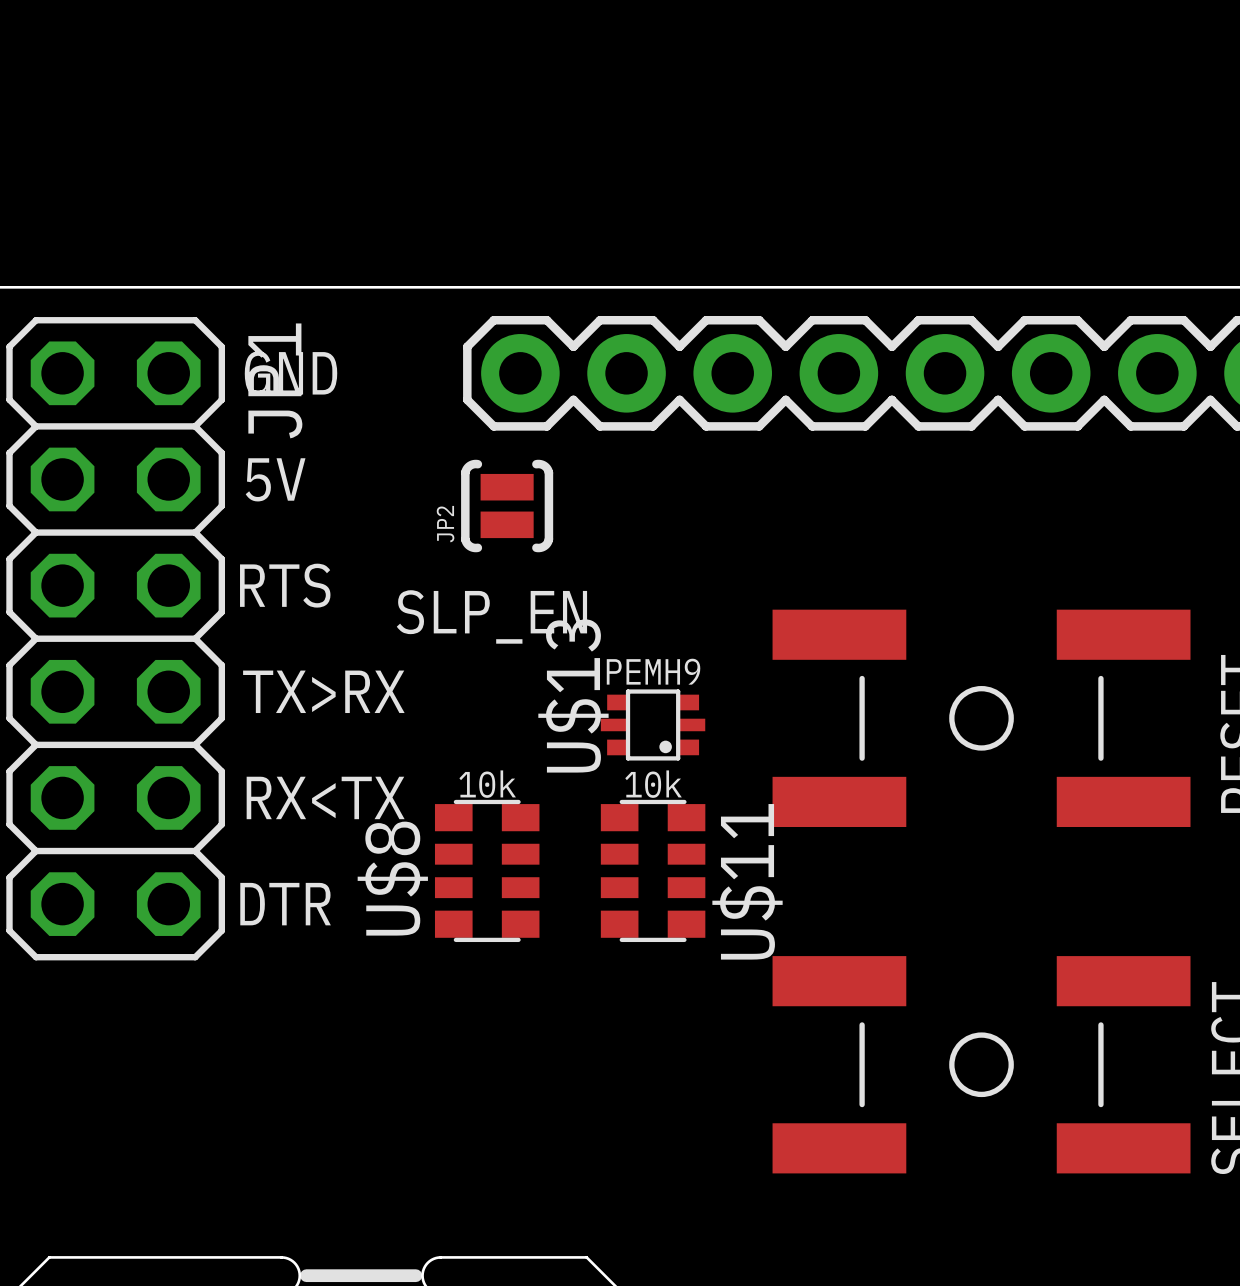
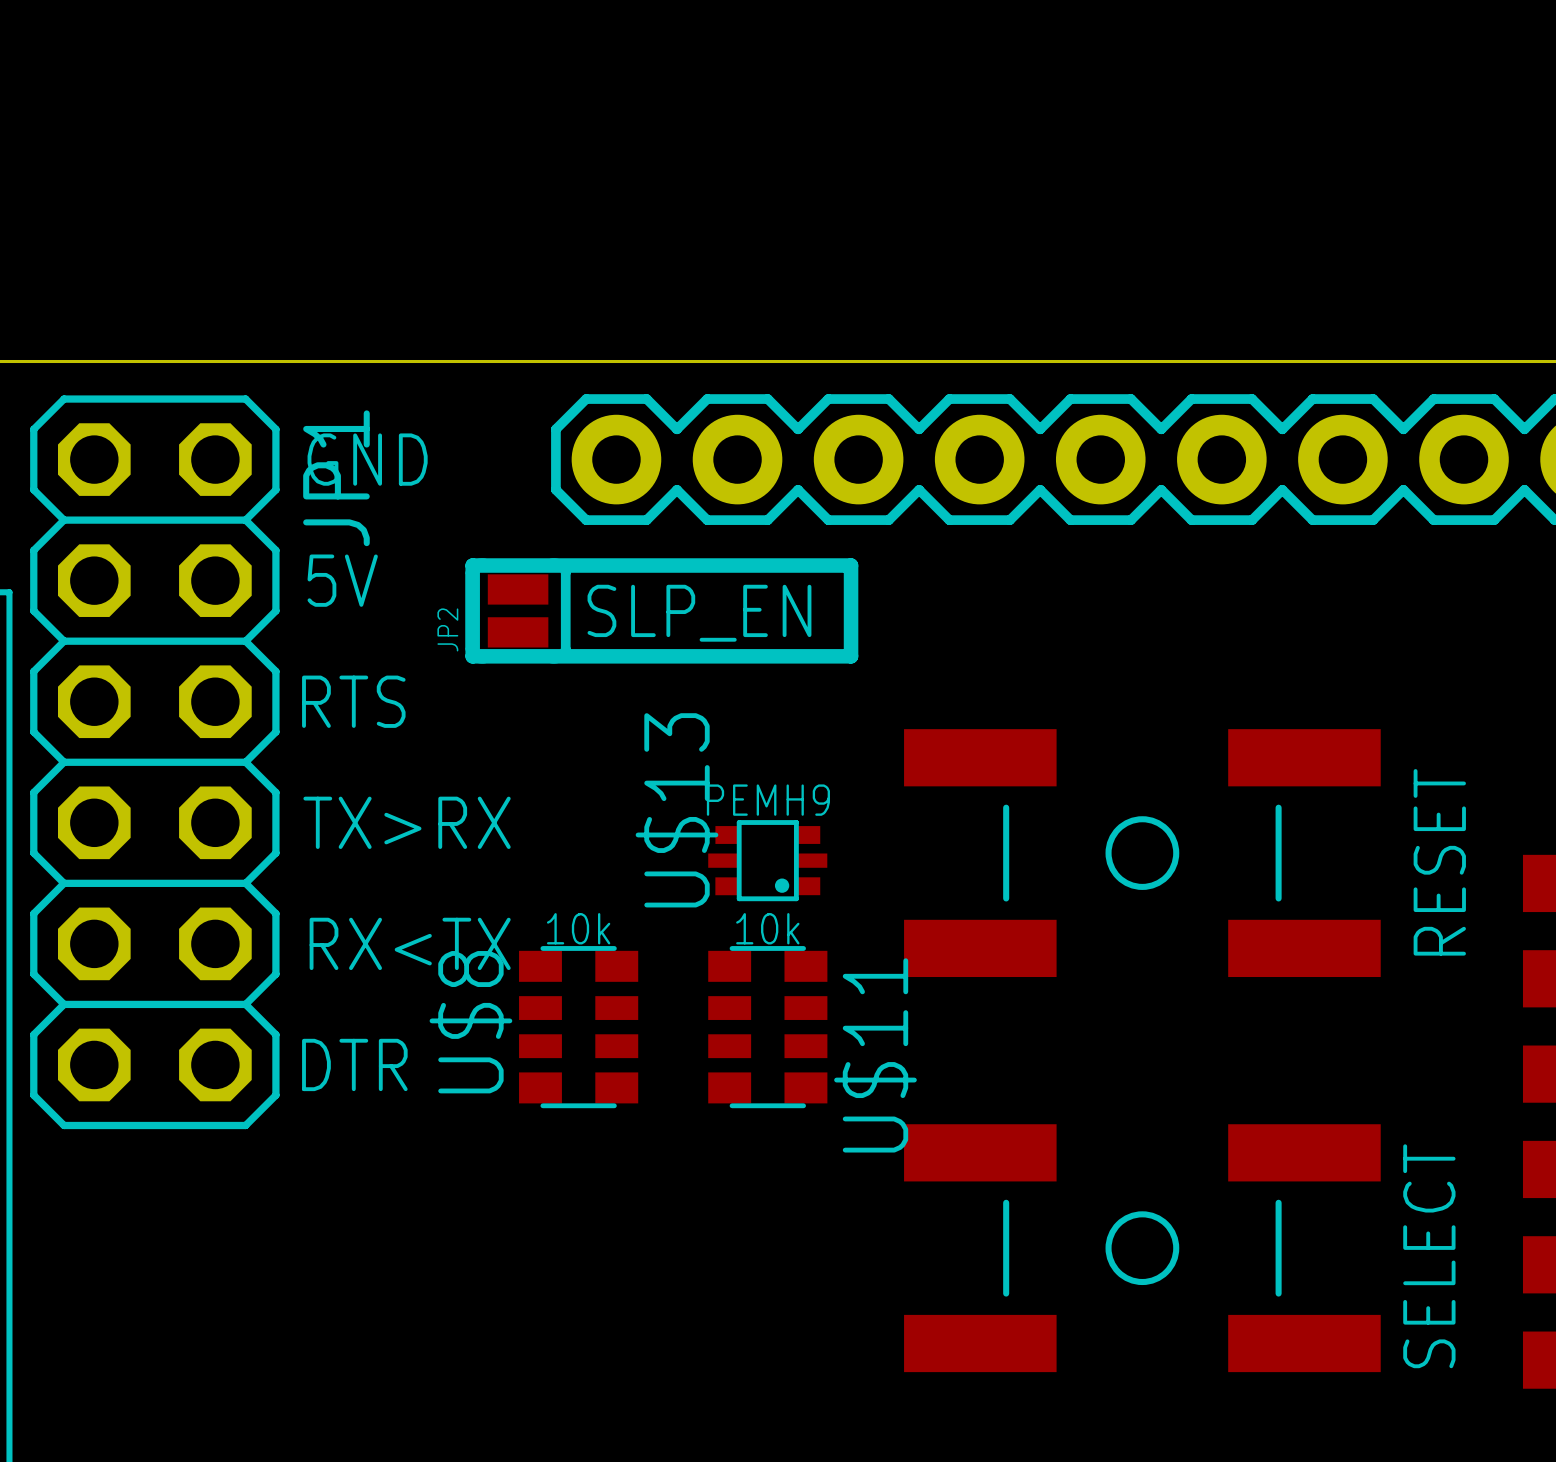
line: none -> (472, 565) (851, 565) (851, 656) (472, 656) (472, 565)
JP2 position: (507, 506) -> (518, 610)
text position: SLP_EN (491, 616) -> SLP_EN (699, 613)

